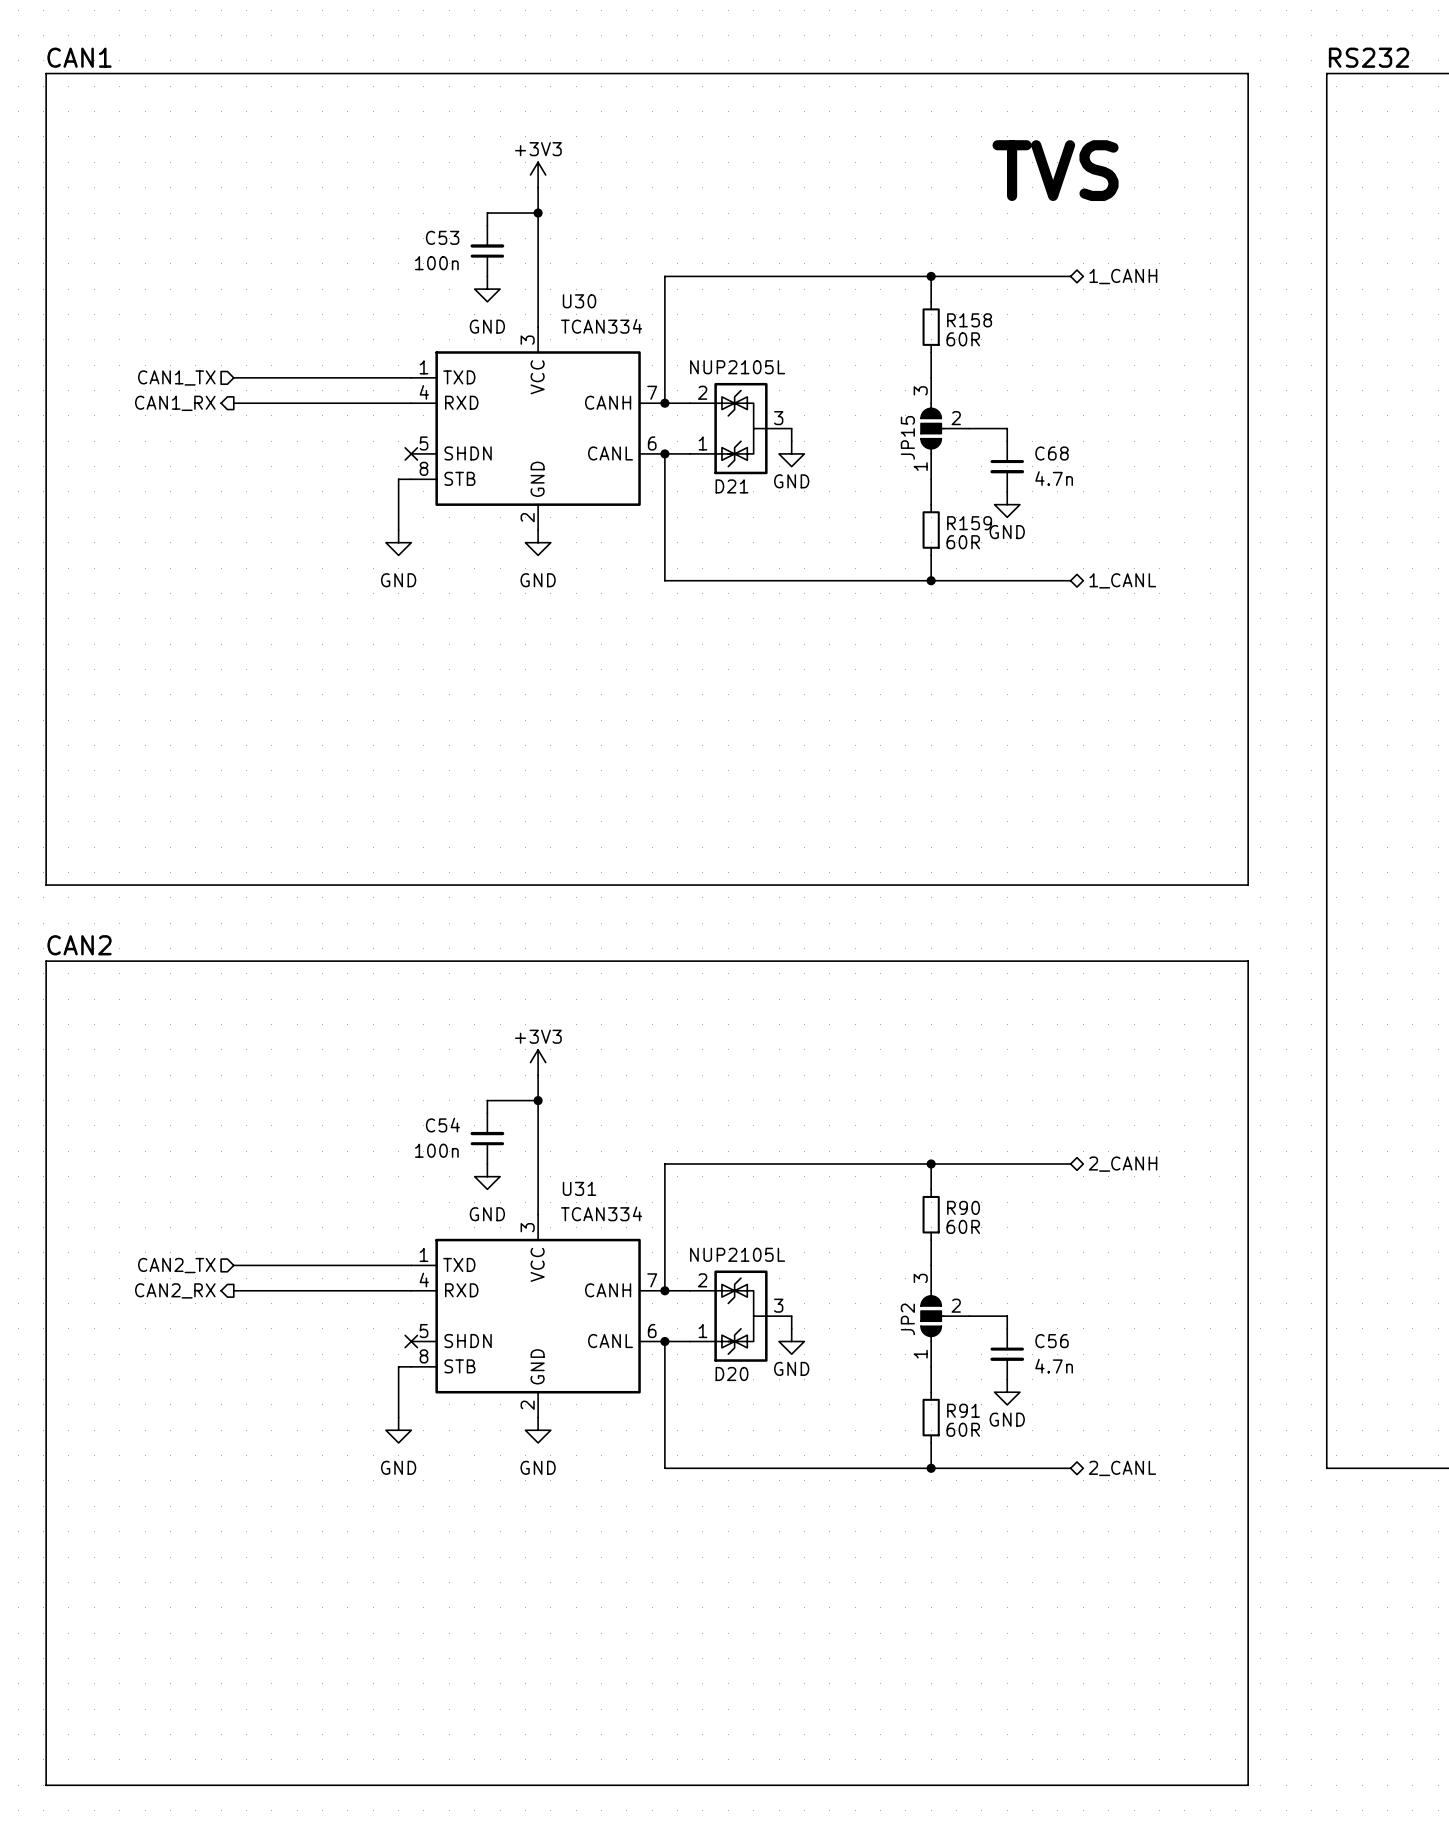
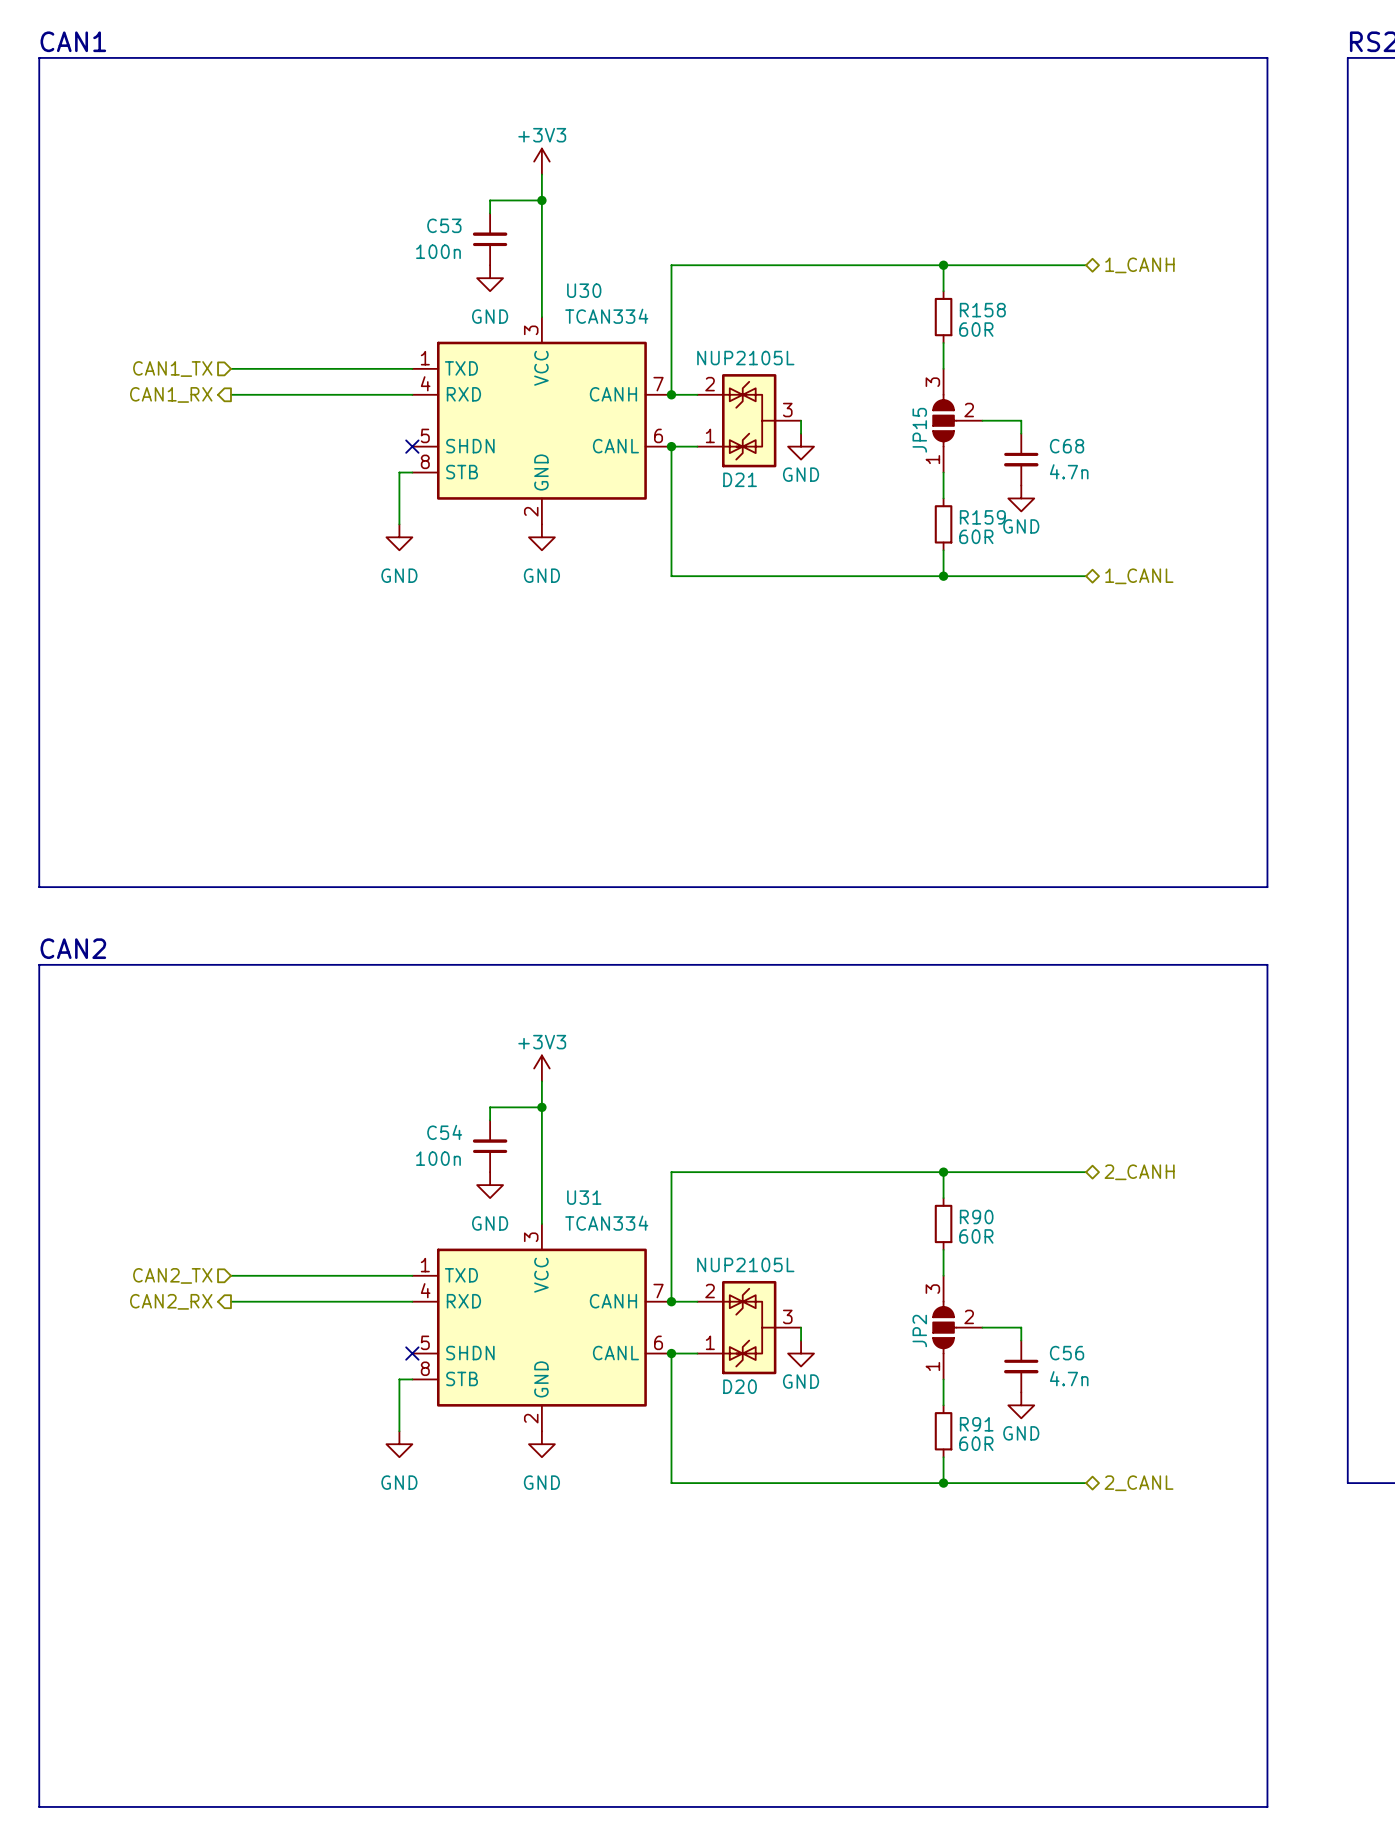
text: TVS (1055, 170) -> none

